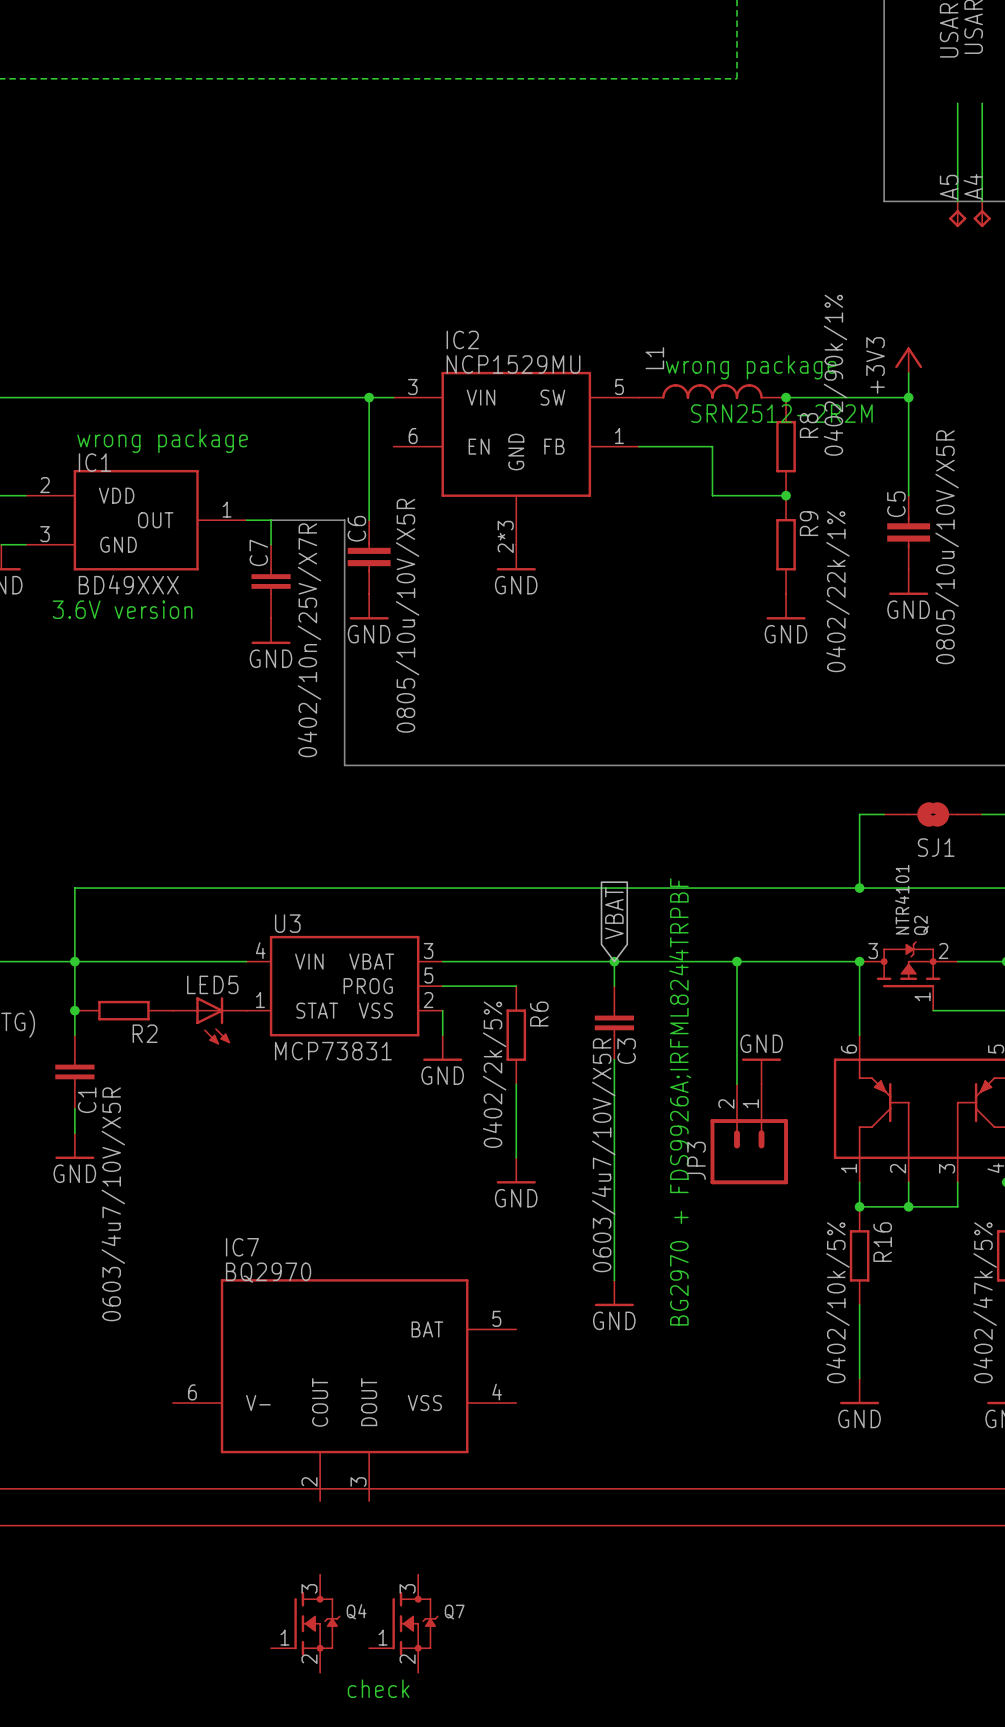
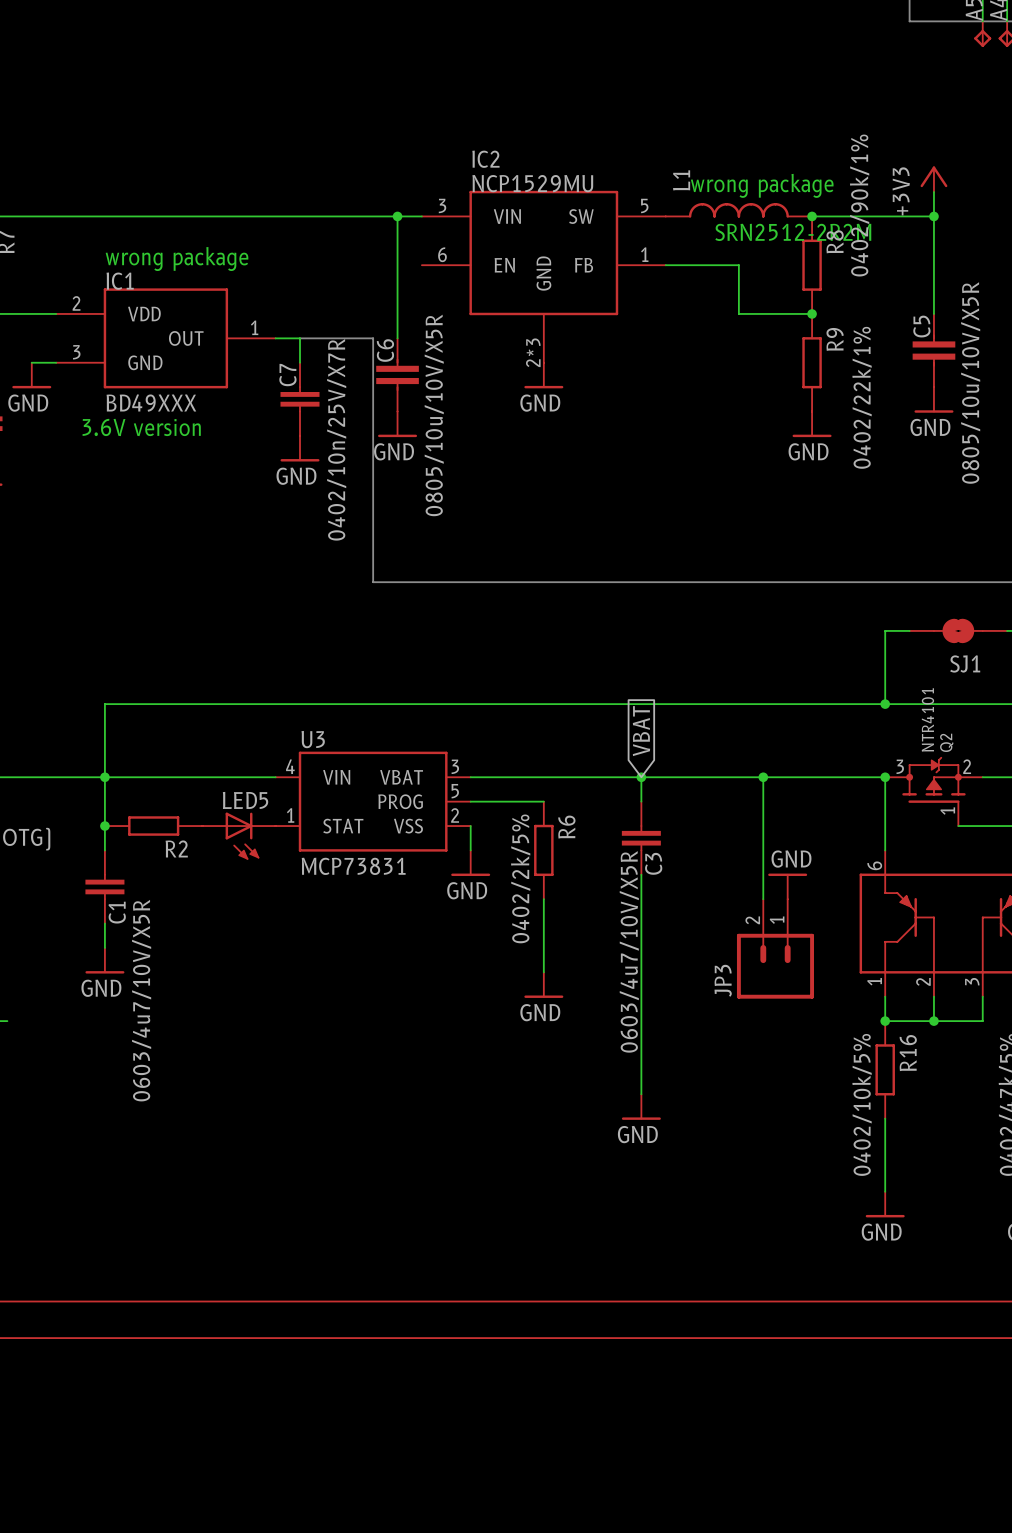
text: BG2970 + FDS9926A;IRFML8244TRPBF (680, 1101) -> none
IC7: BQ2970 (344, 1390) -> none
Q4: (305, 1623) -> none
Q7: (403, 1623) -> none
text: check (378, 1688) -> none

